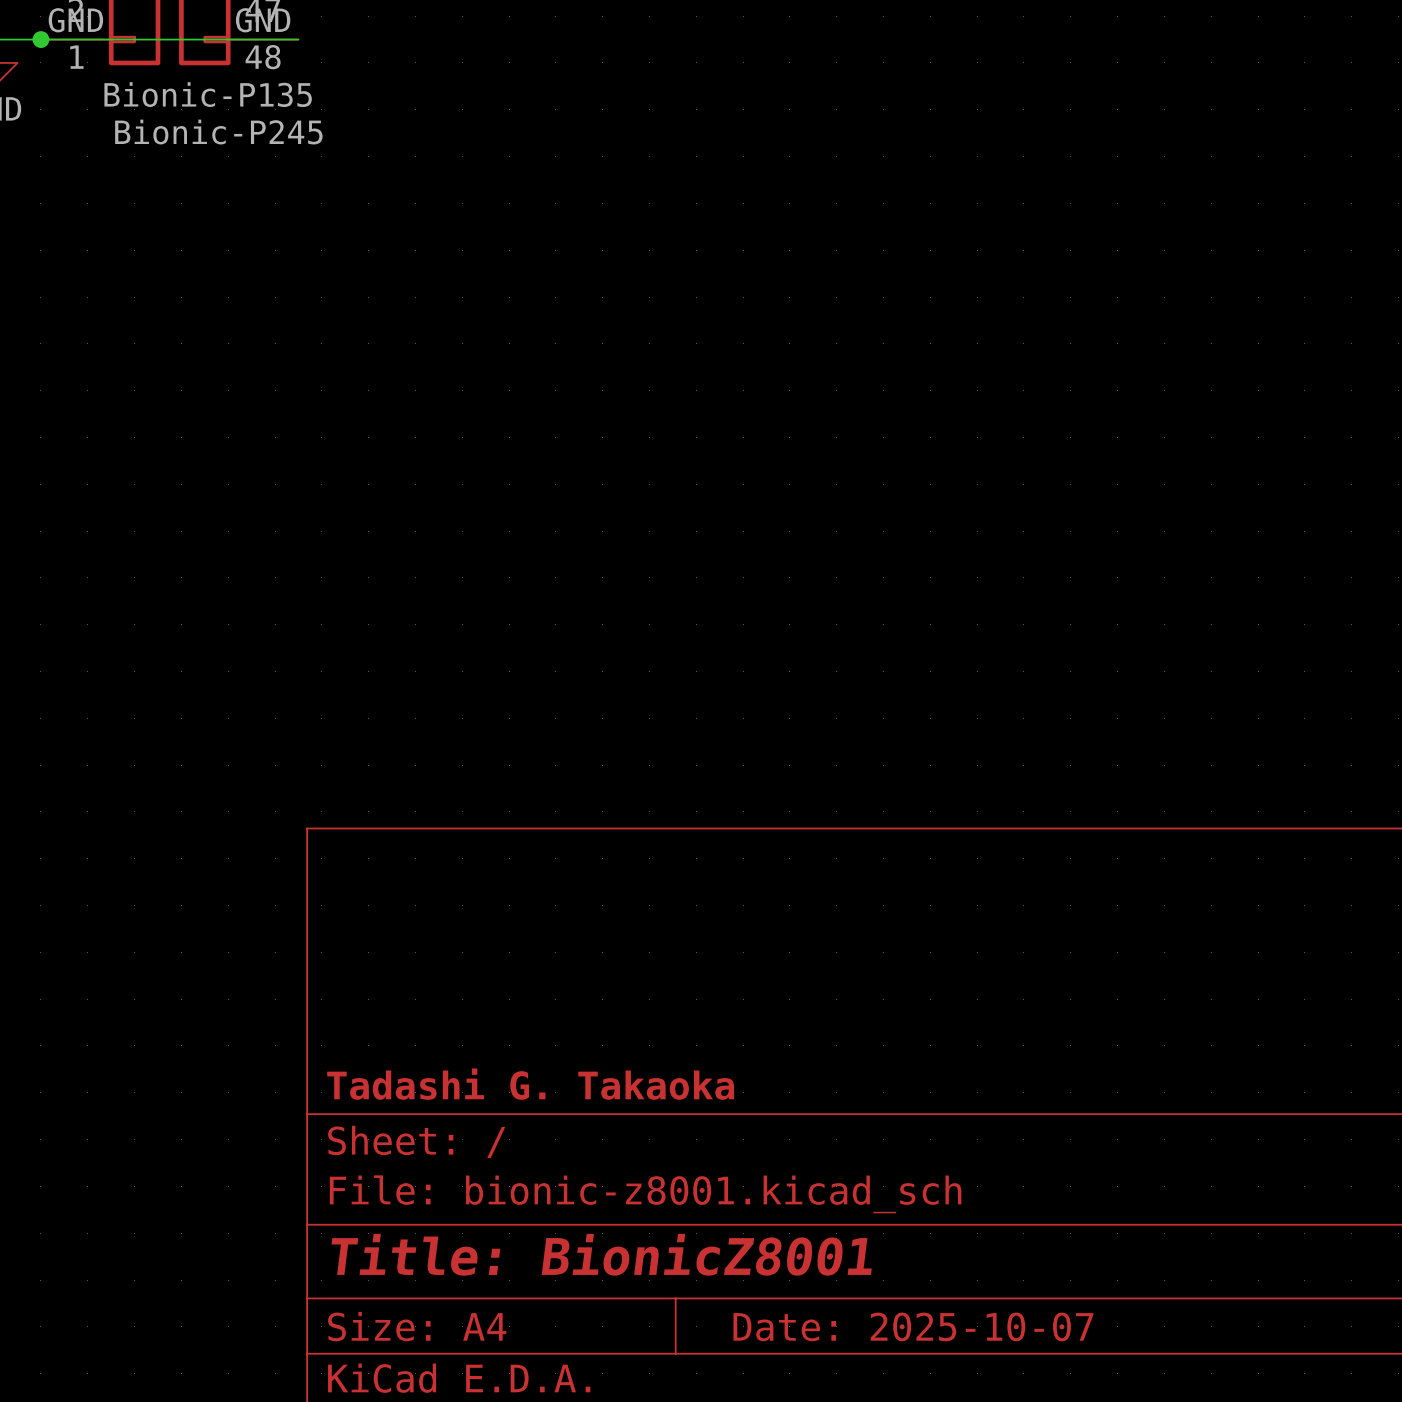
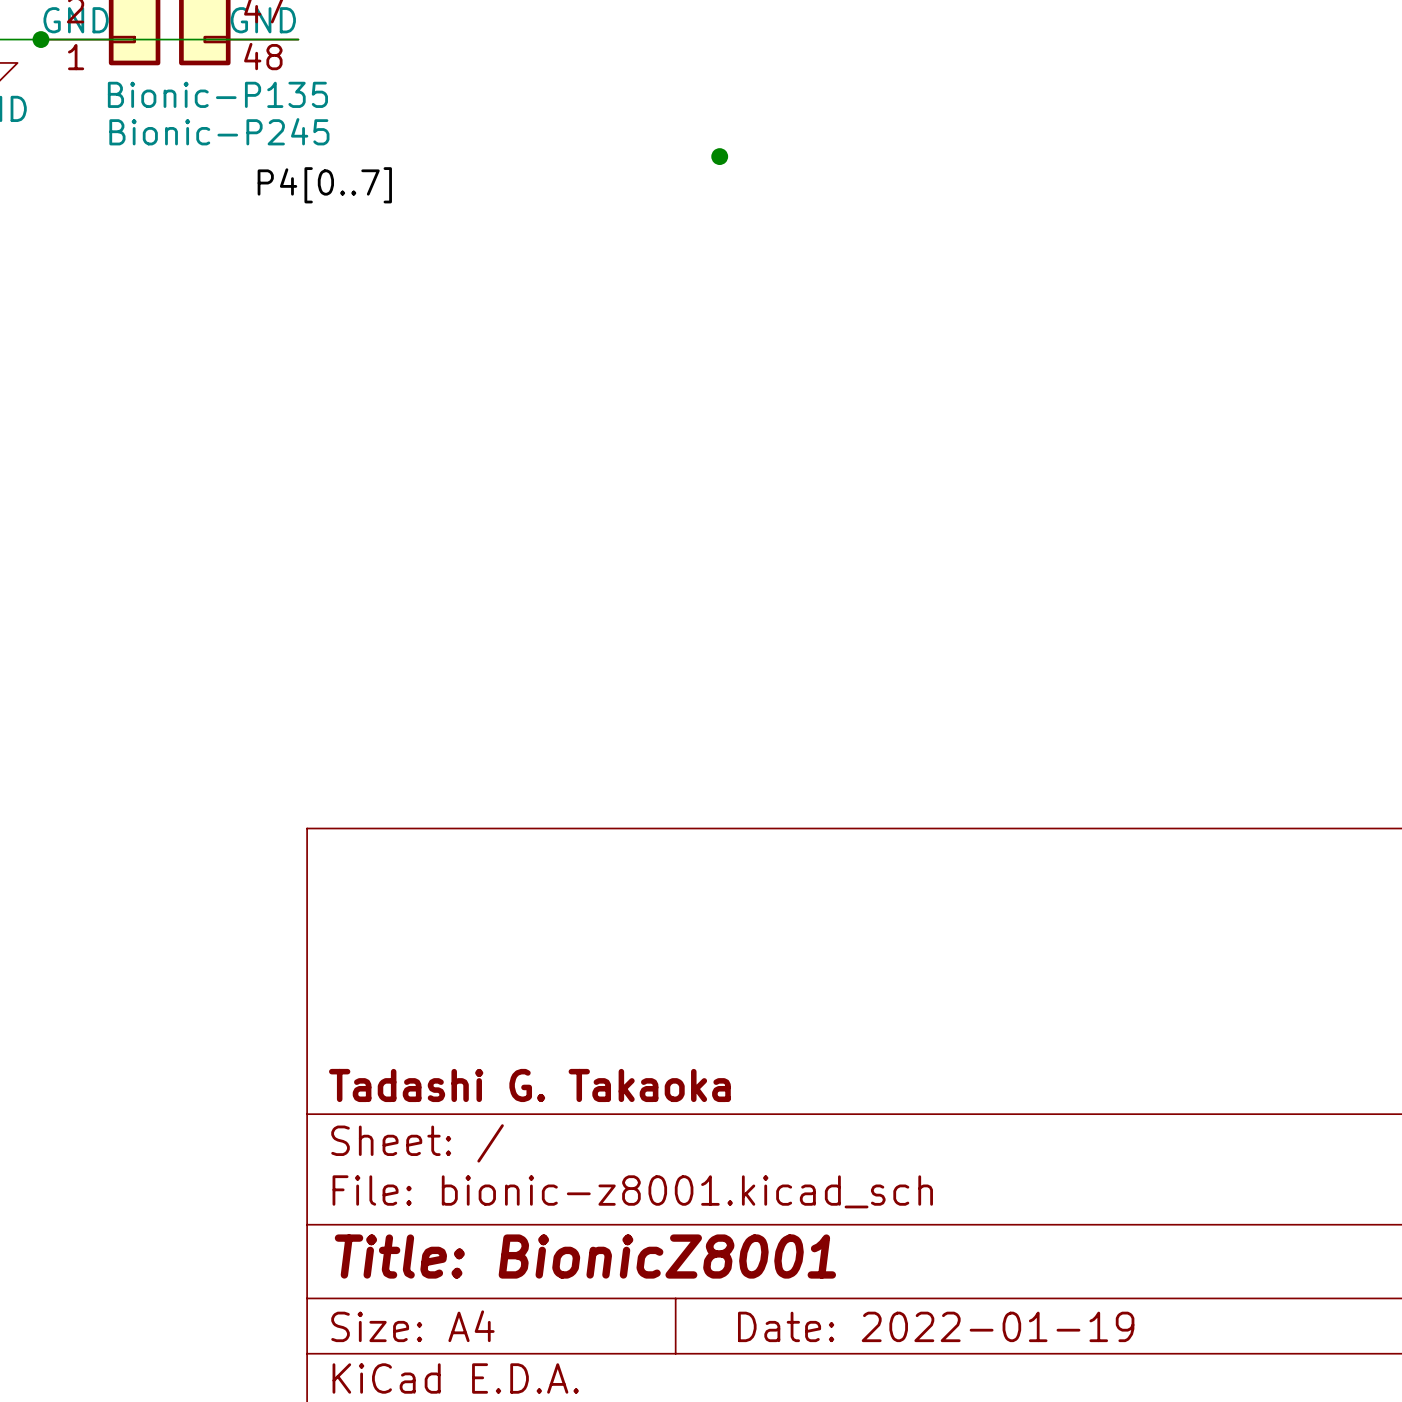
junction: none -> (719, 156)
label: none -> P4[0..7] (324, 185)
title block: Date: 2025-10-07 (913, 1326) -> Date: 2022-01-19 (936, 1326)

